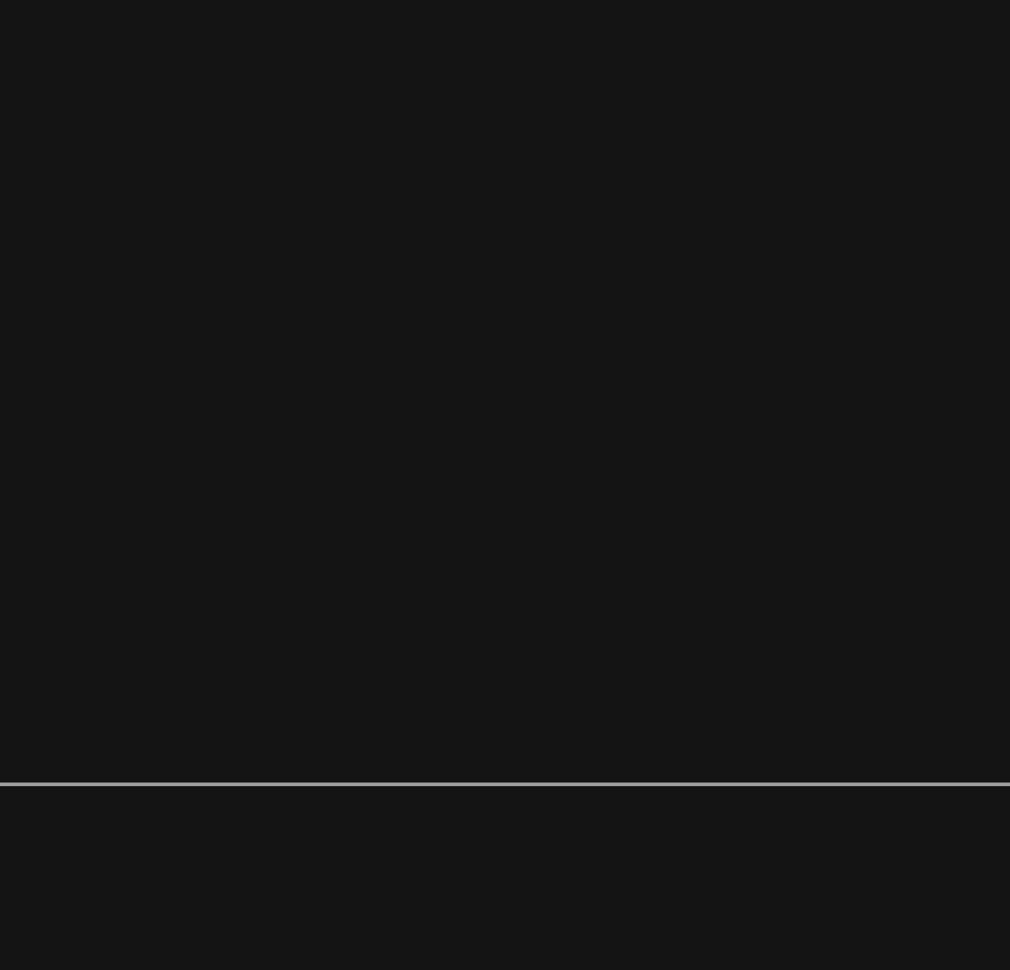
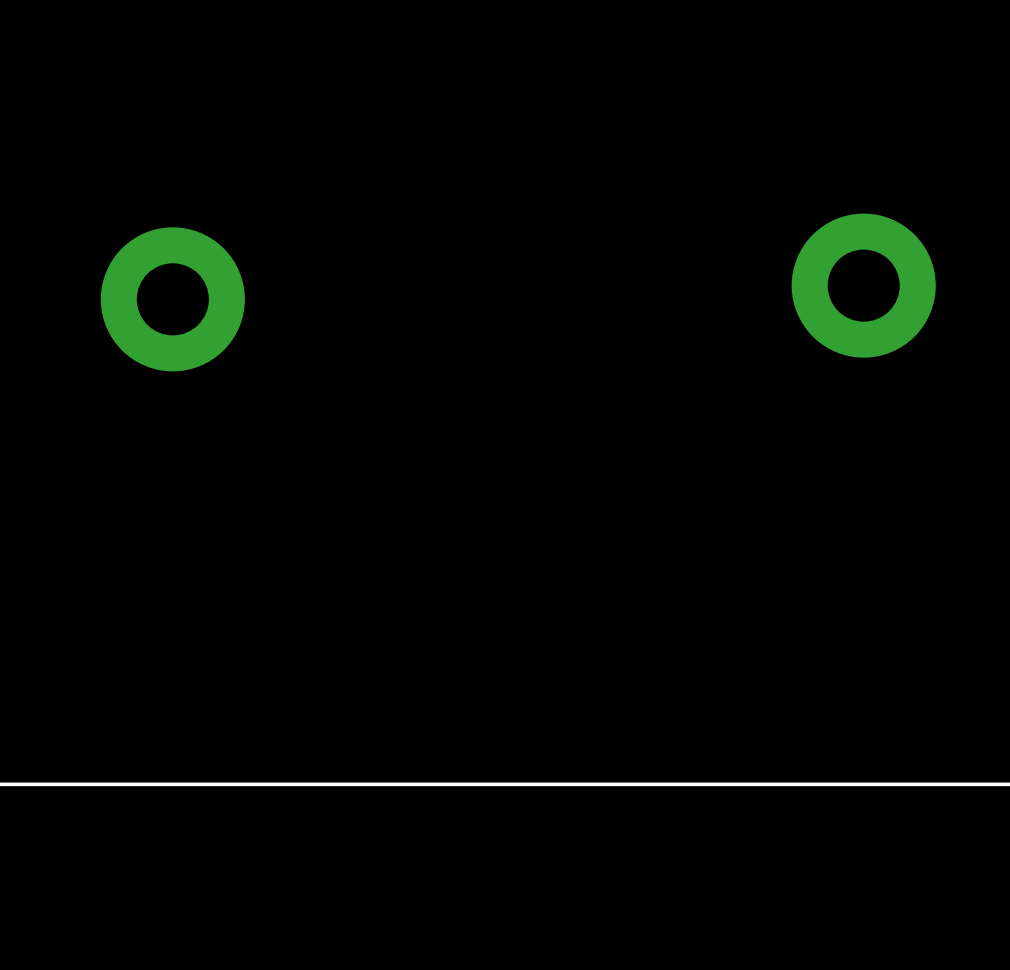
part: none -> (863, 285)
part: none -> (172, 299)

